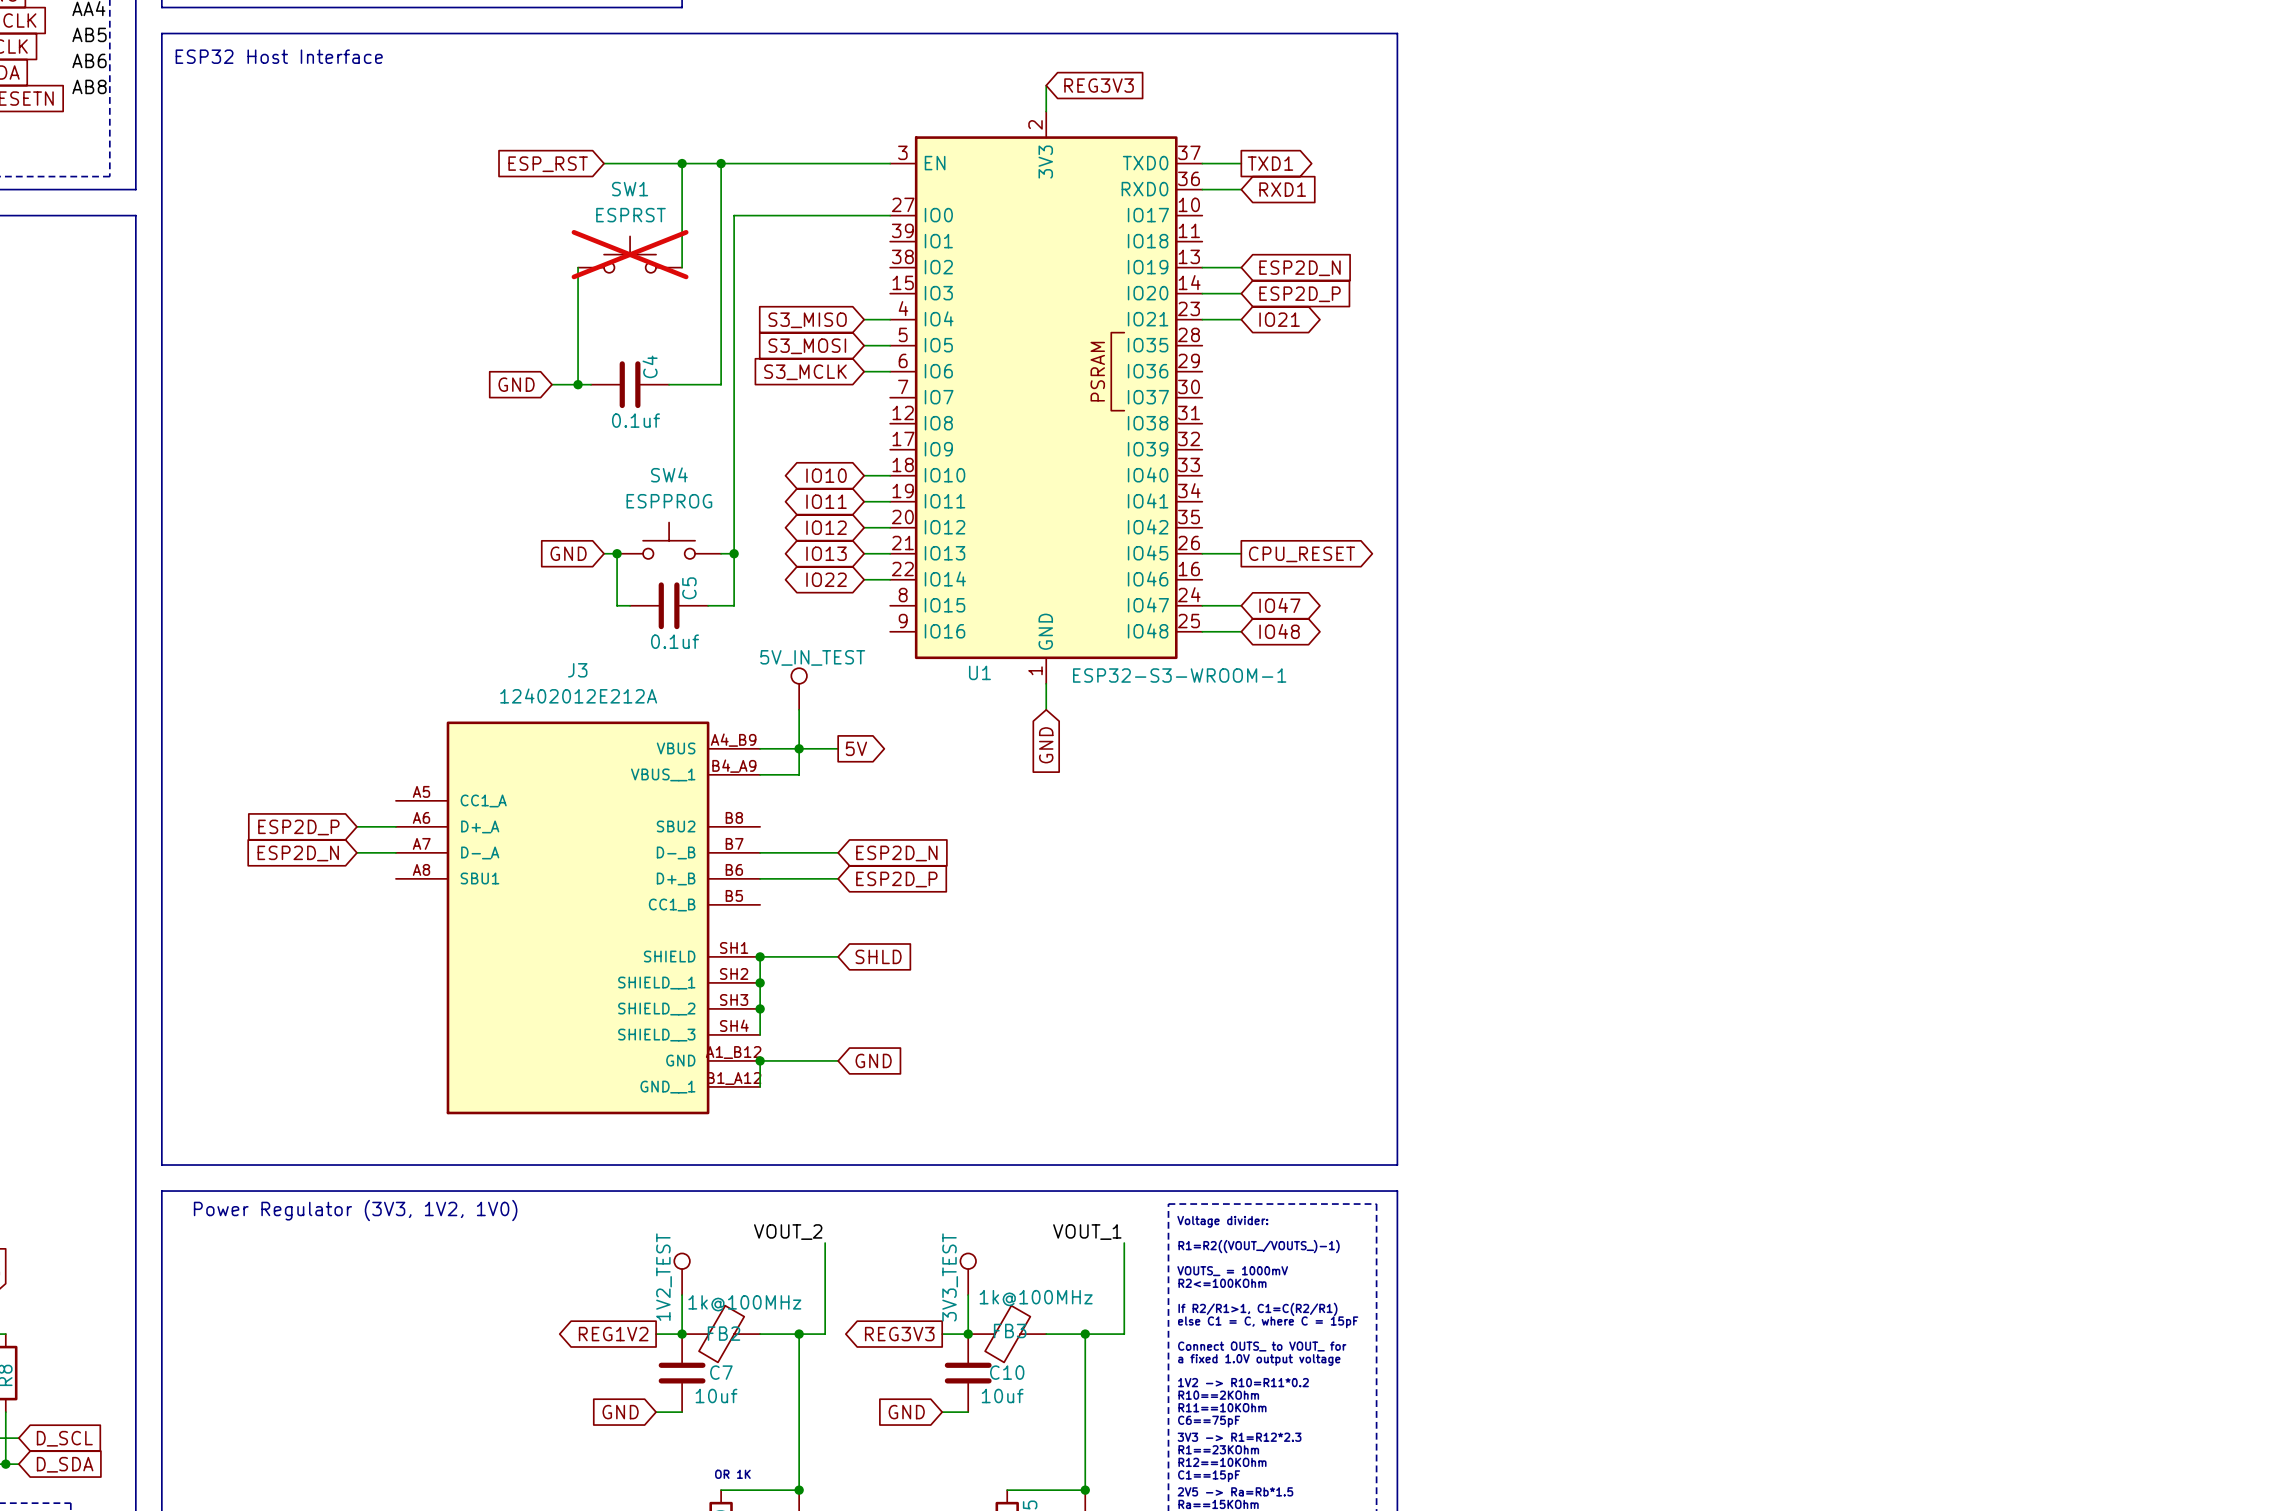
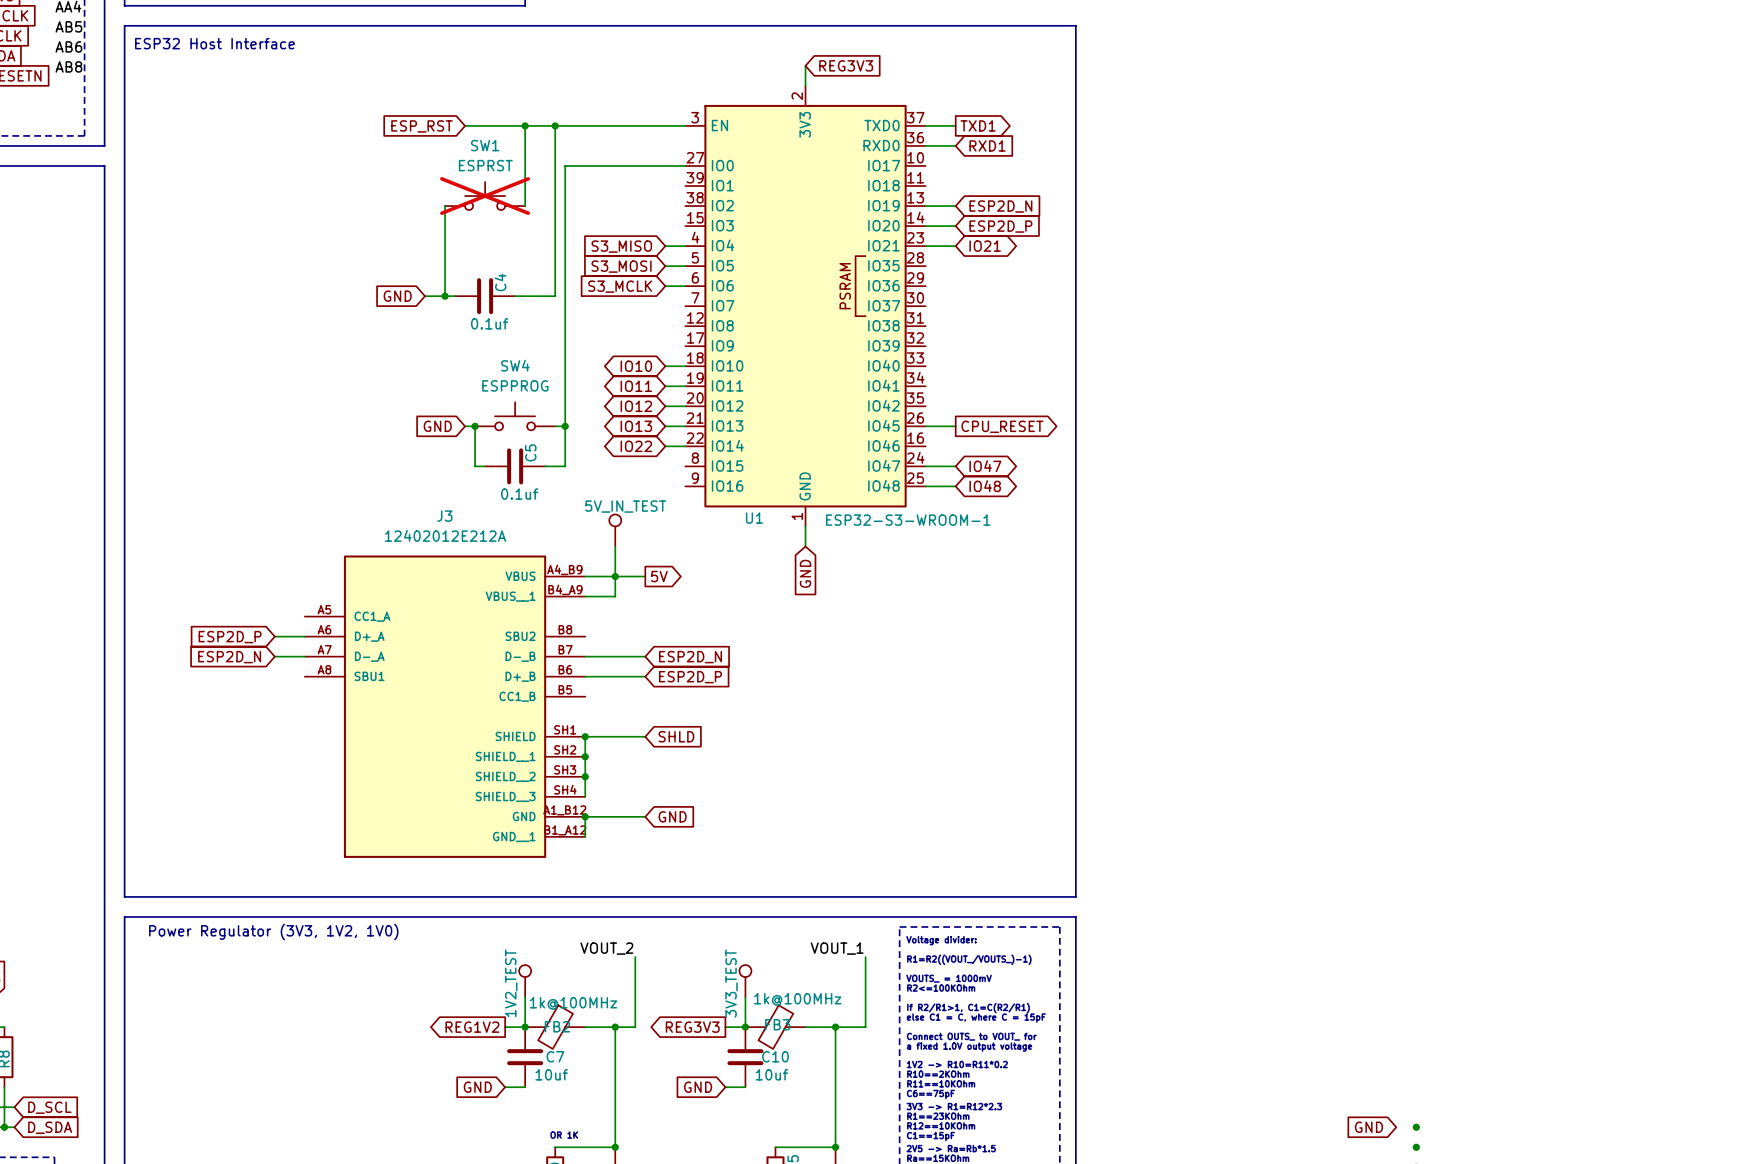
global label: none -> GND (1368, 1127)
junction: none -> (1416, 1127)
junction: none -> (1416, 1147)

